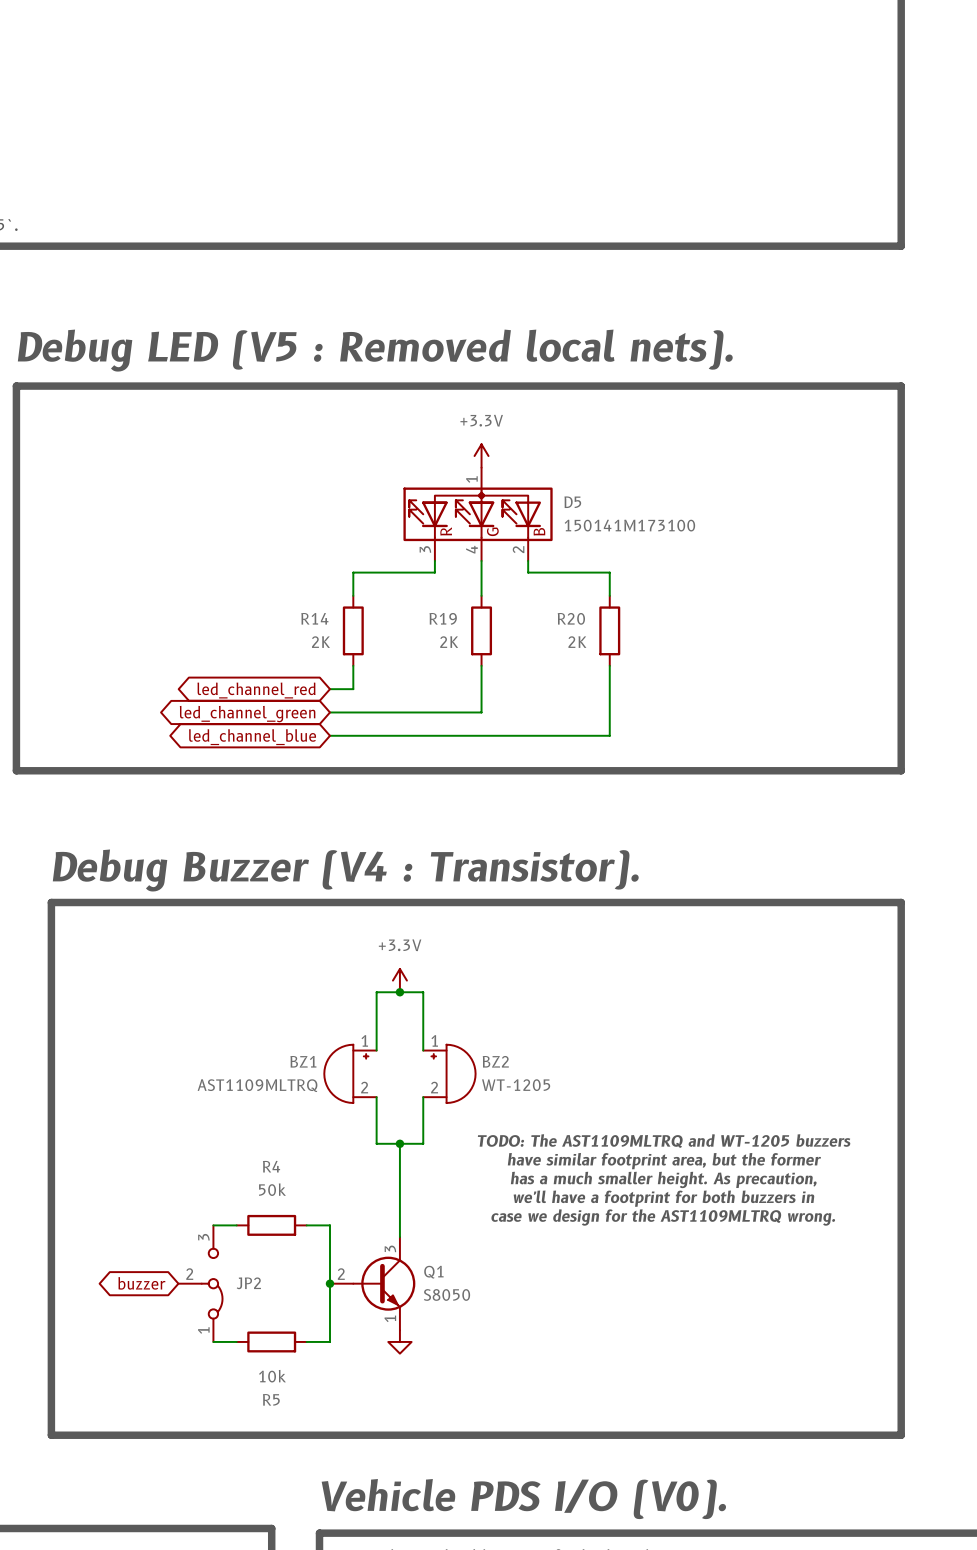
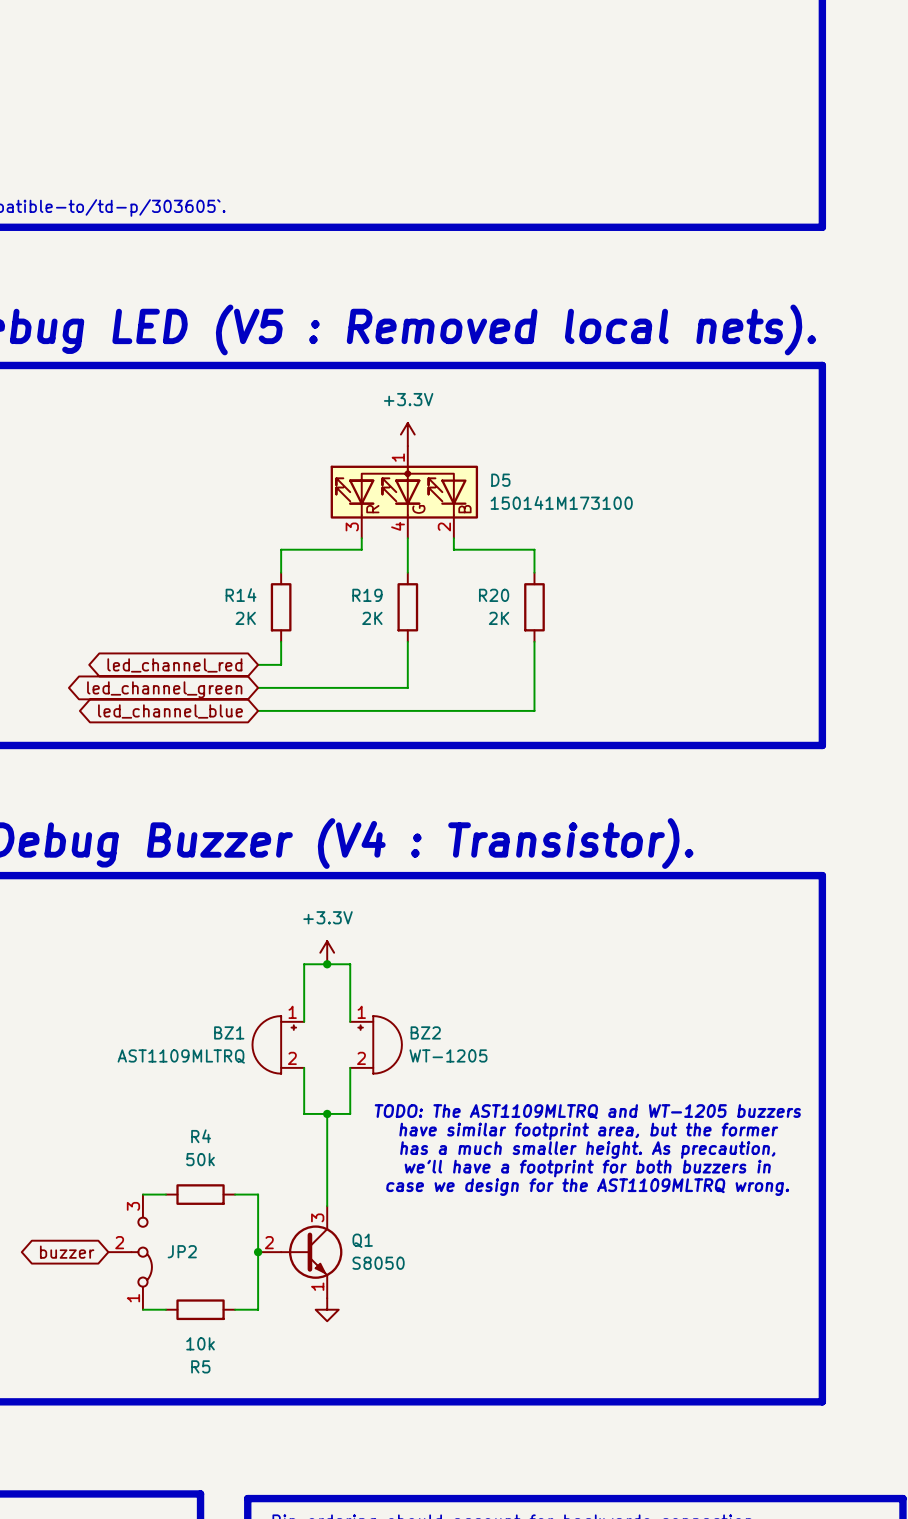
text: Vehicle PDS I/O (V0). (523, 1499) -> none

